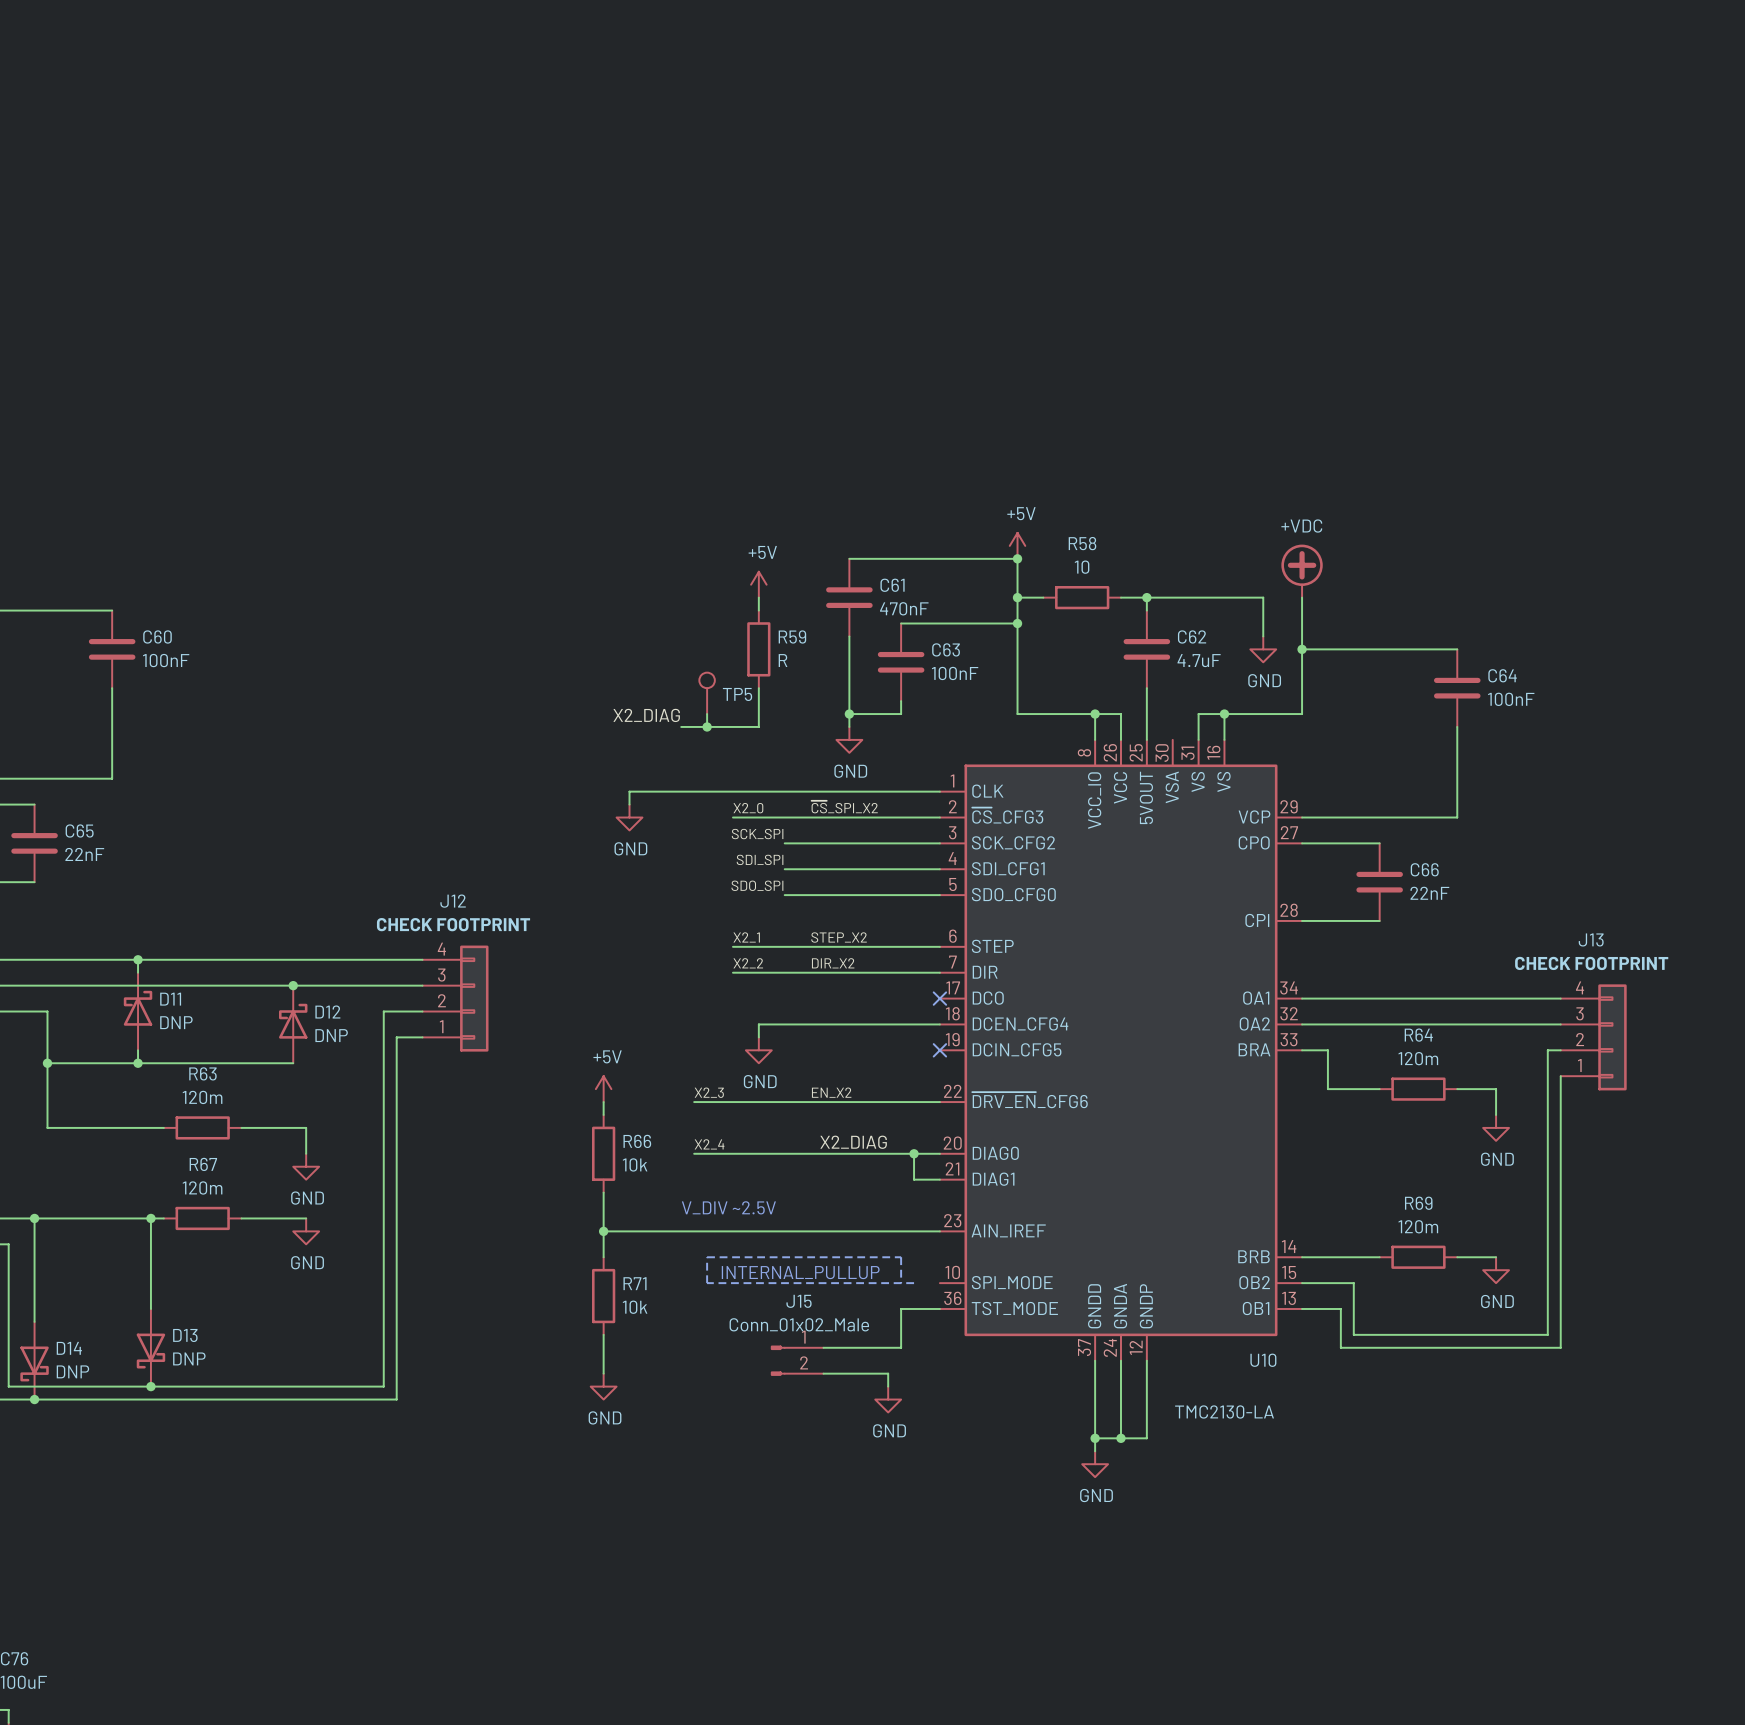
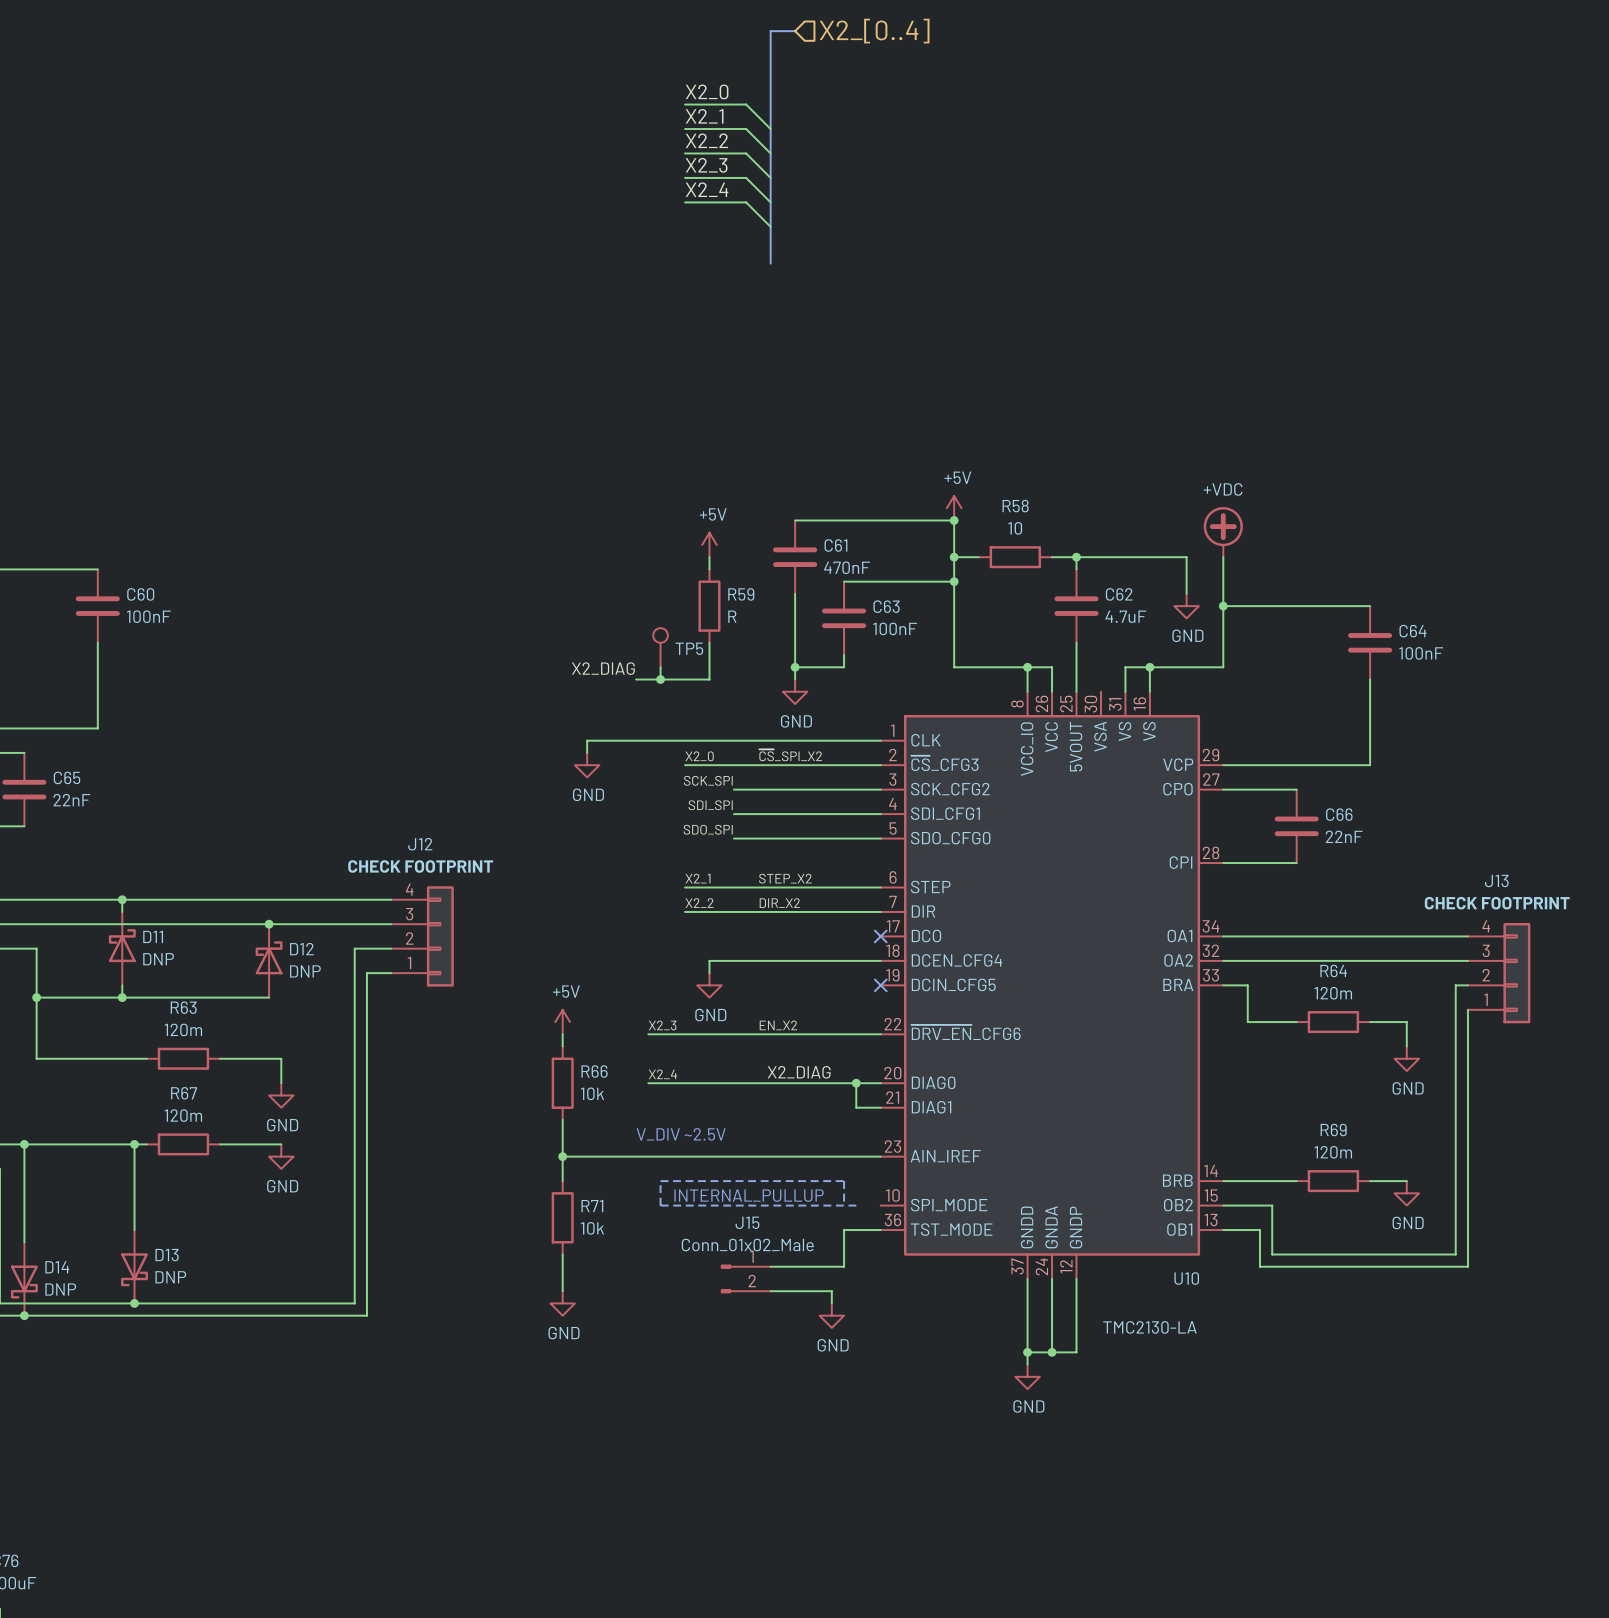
bus: none -> (795, 31) (770, 31) (770, 263)
hierarchical label: none -> X2_[0..4] (874, 31)
label: none -> X2_0 (707, 91)
wire: none -> (685, 104) (746, 104) (770, 129)
label: none -> X2_1 (704, 116)
wire: none -> (685, 129) (746, 129) (770, 153)
label: none -> X2_2 (706, 140)
wire: none -> (685, 153) (746, 153) (770, 177)
label: none -> X2_3 (706, 165)
wire: none -> (685, 177) (746, 177) (770, 202)
label: none -> X2_4 (707, 189)
wire: none -> (685, 202) (746, 202) (770, 226)

